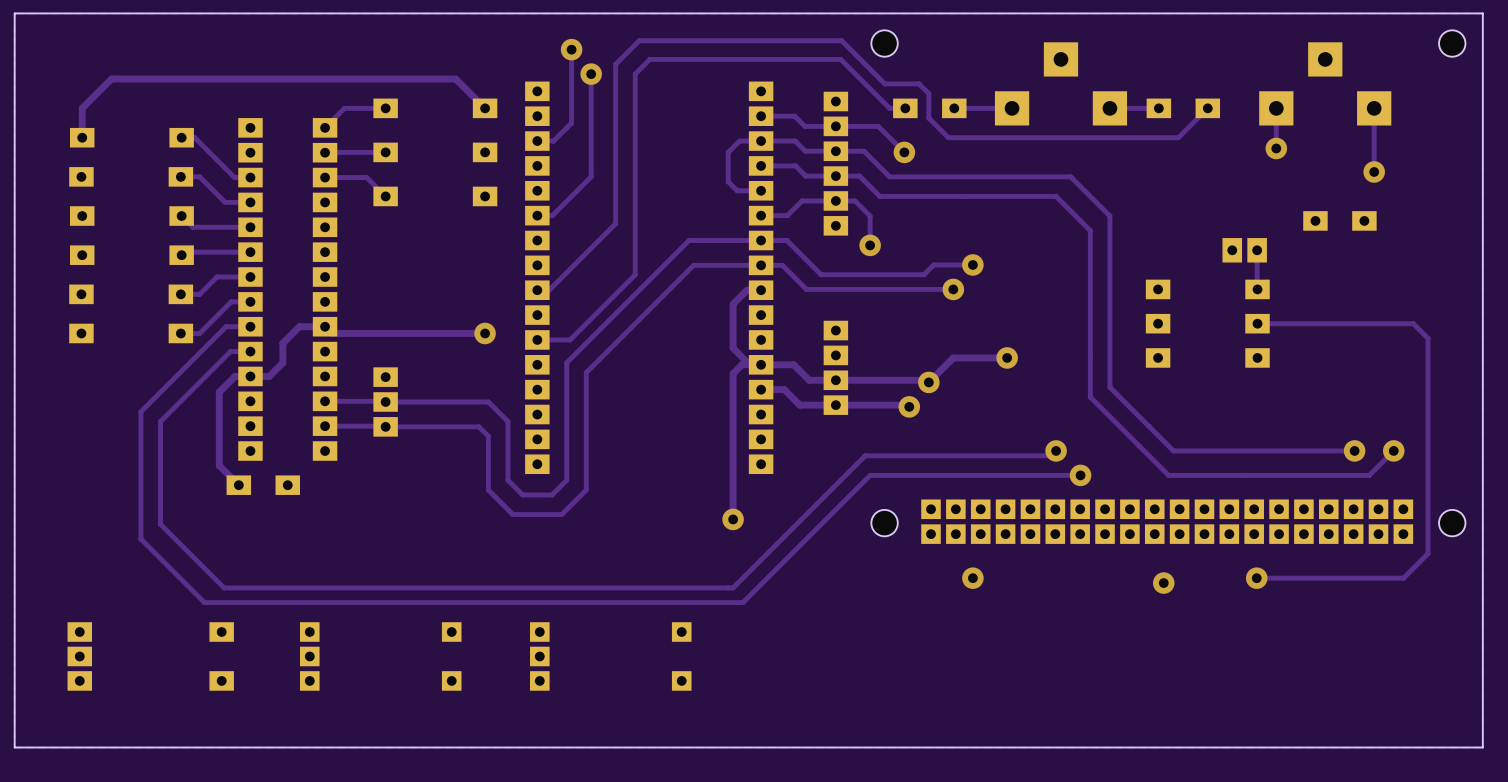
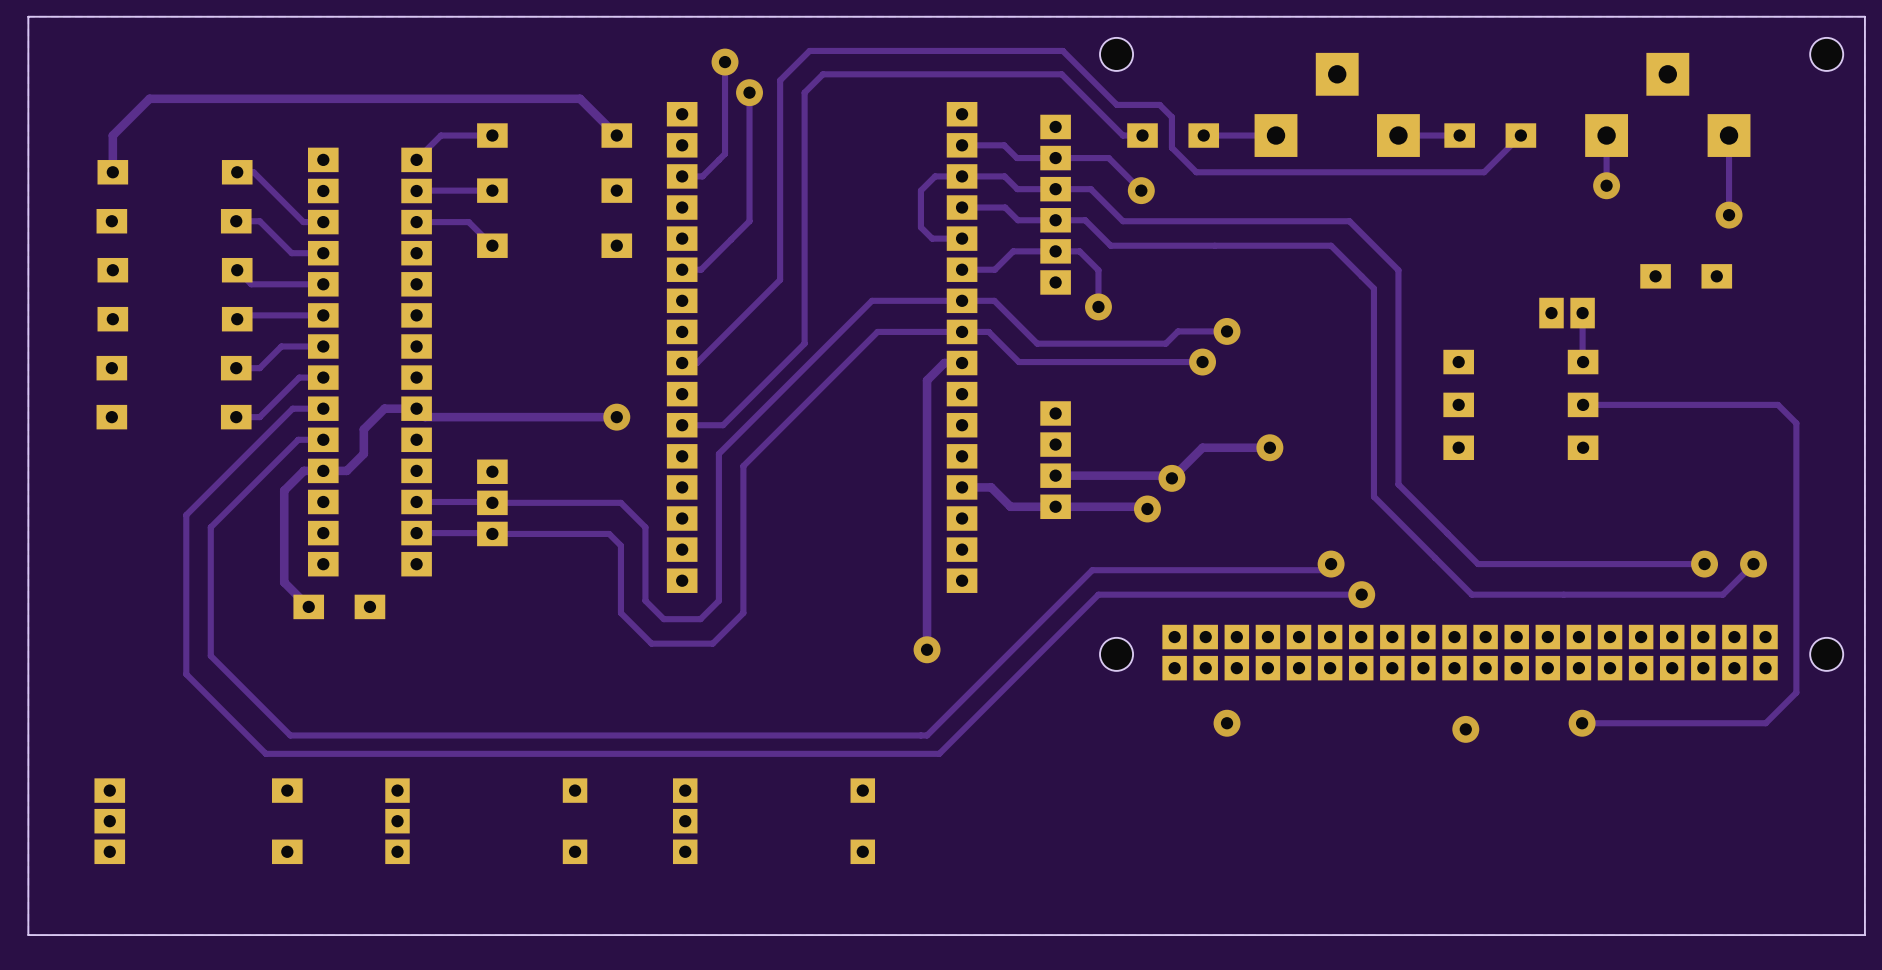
track: (733, 348) (749, 364) -> (927, 435) (927, 467)
track: (733, 373) (742, 364) (793, 364) (809, 380) (835, 380) -> none

